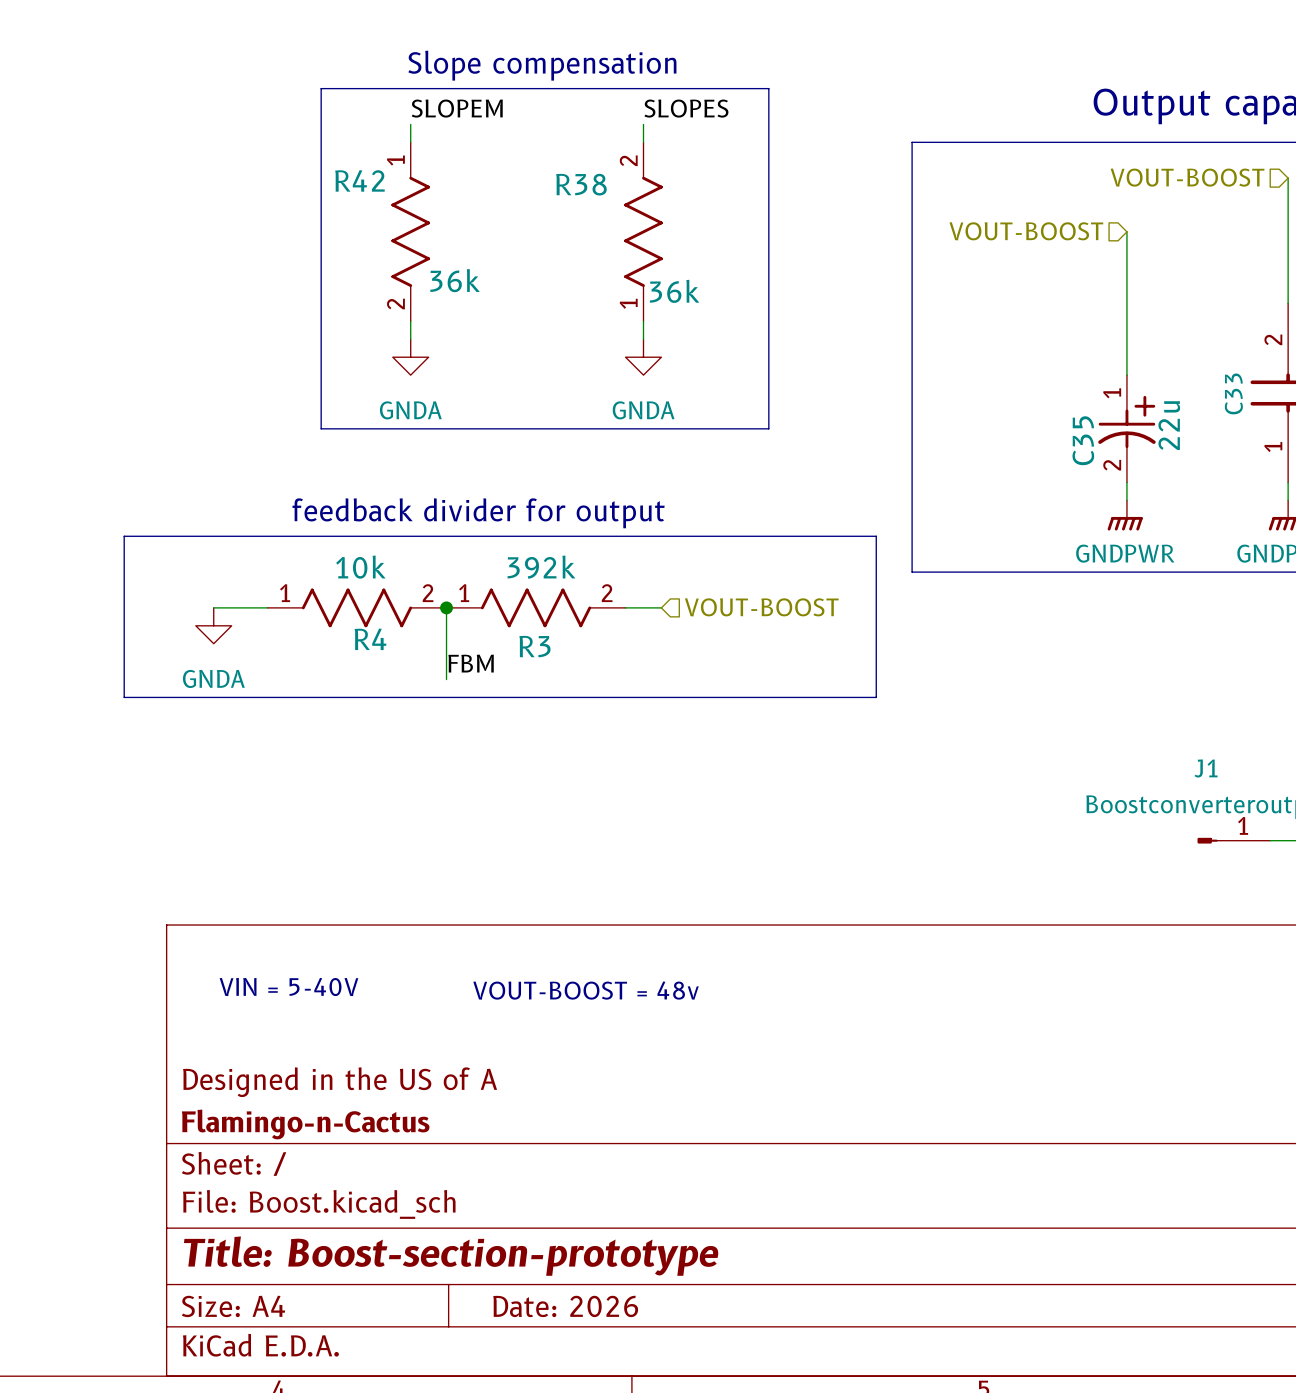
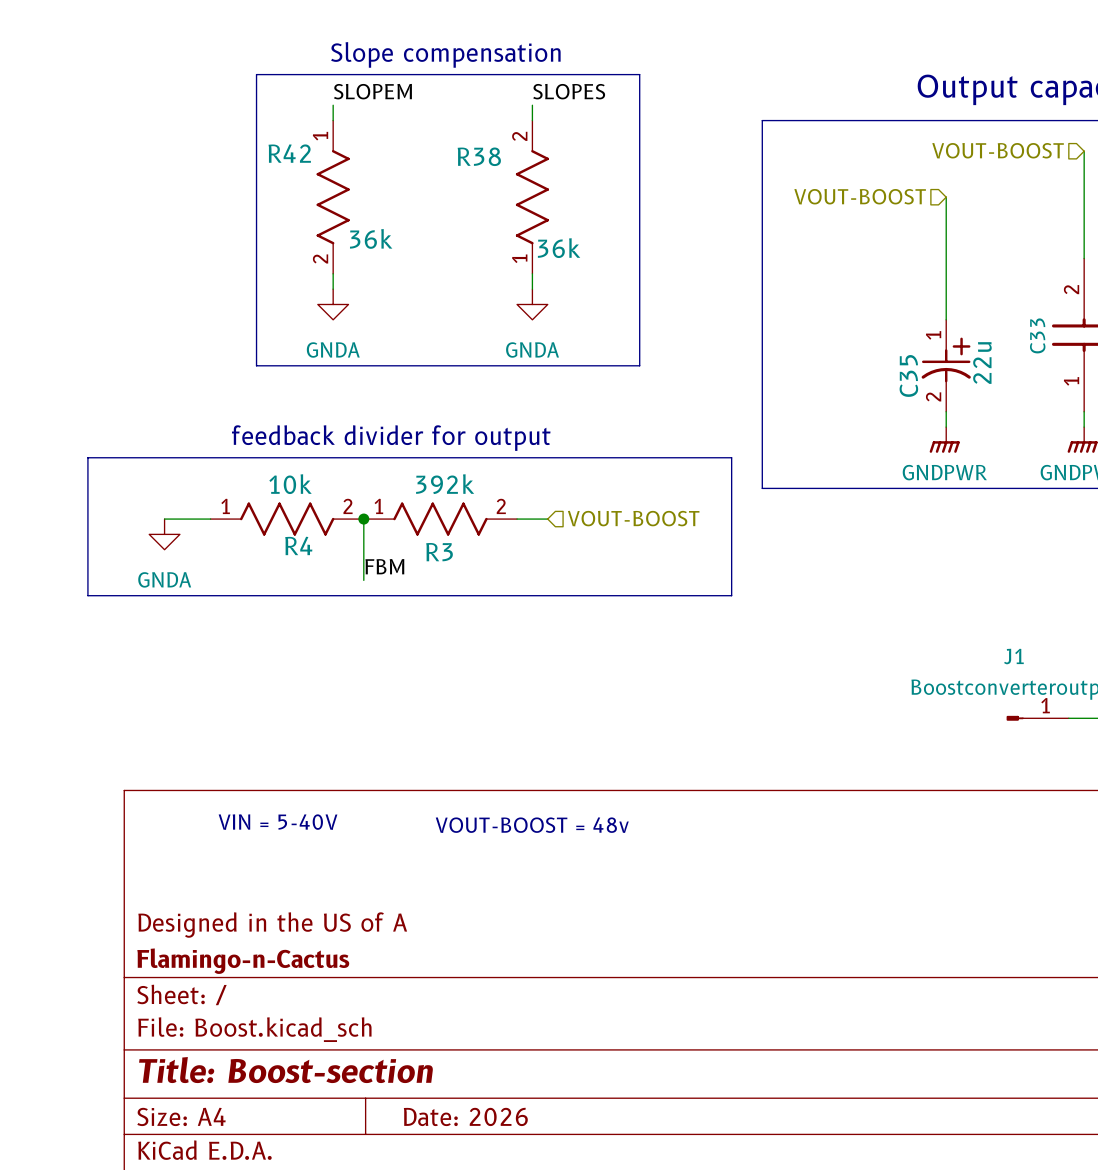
text position: VIN = 5-40V (288, 987) -> VIN = 5-40V (278, 822)
text position: VOUT-BOOST = 48v (586, 990) -> VOUT-BOOST = 48v (532, 825)
title block: Title: Boost-section-prototype (451, 1256) -> Title: Boost-section (285, 1070)

